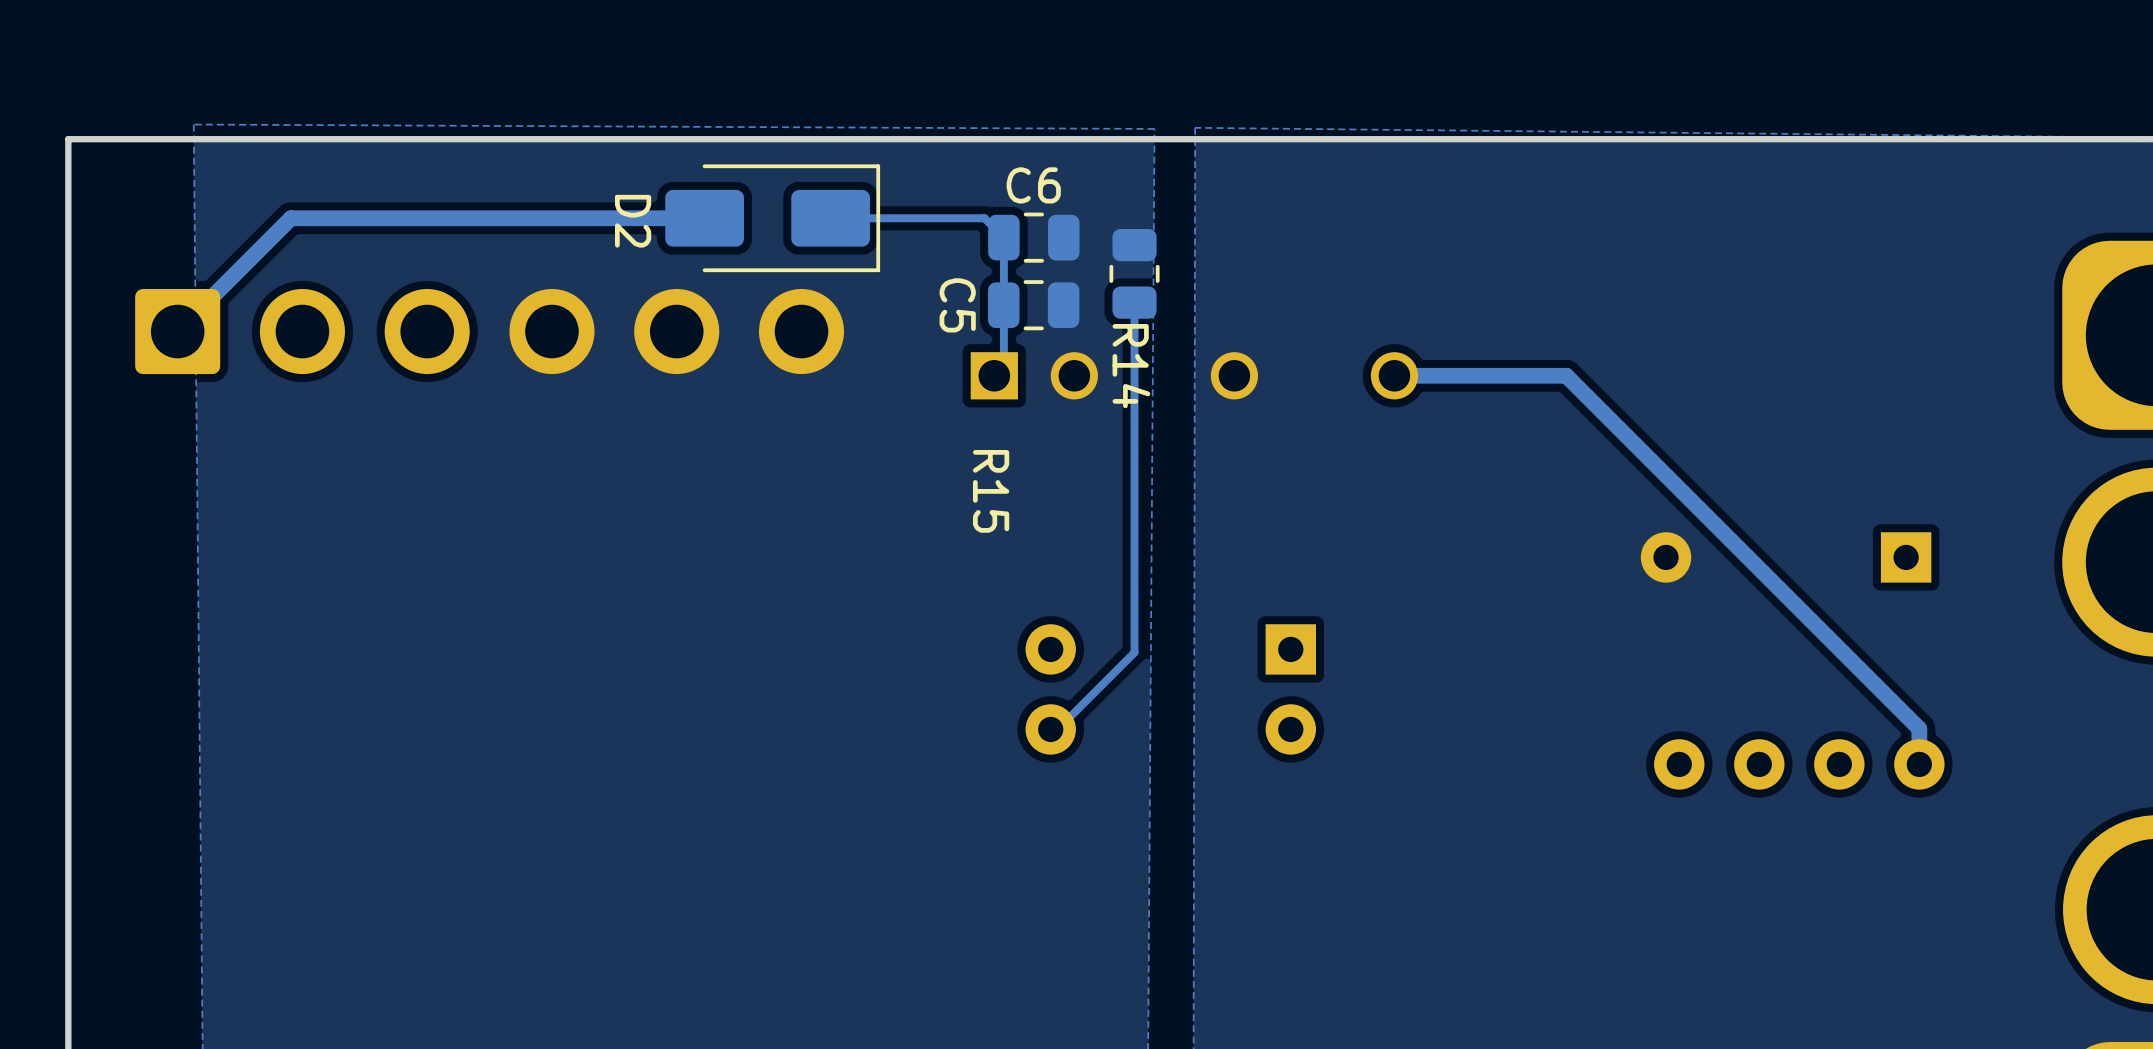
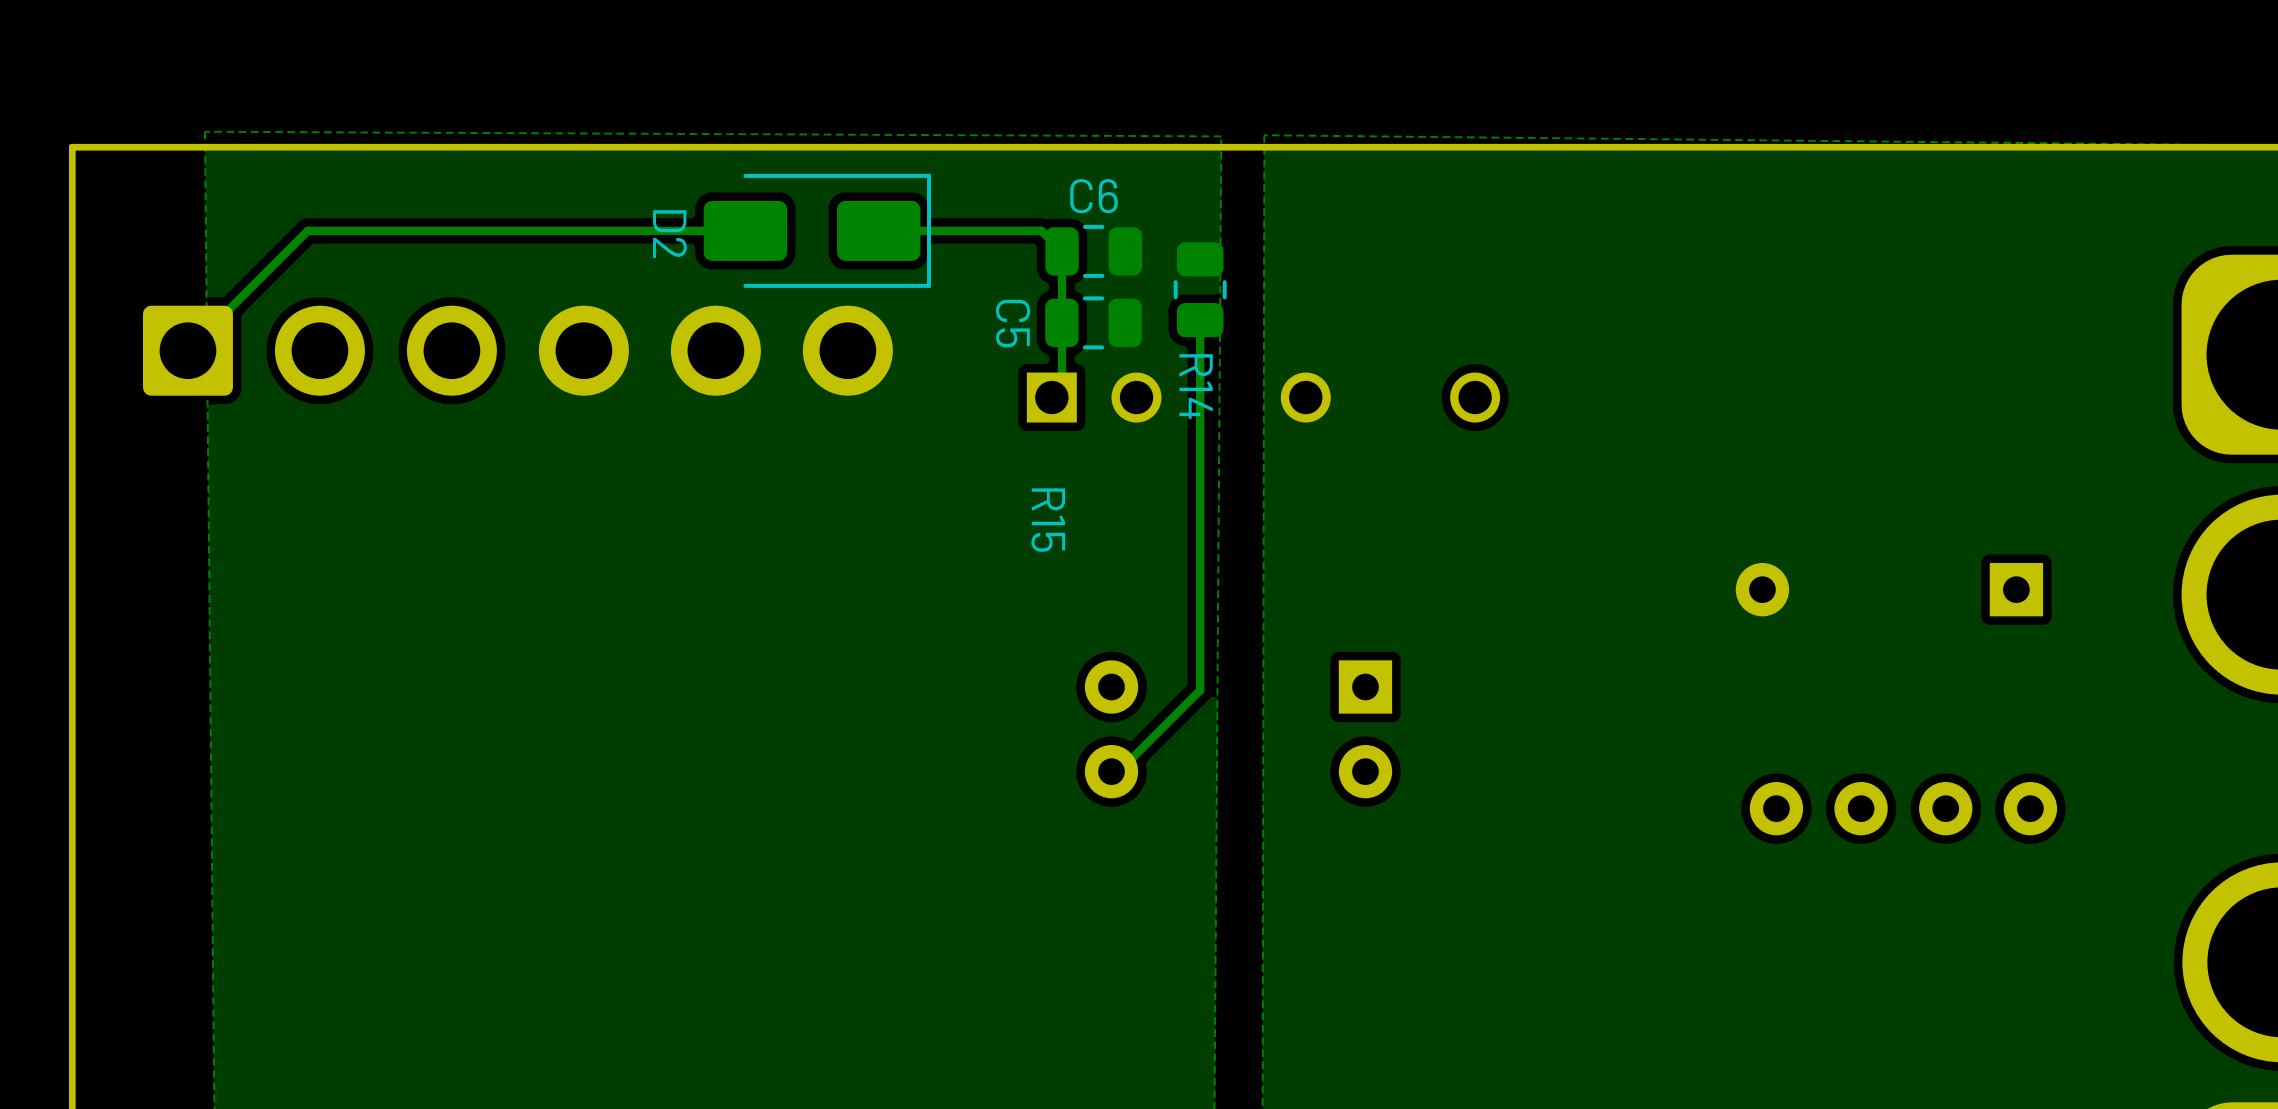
track width: thick (704, 218) (290, 218) (177, 331) -> thin (745, 230) (307, 230) (187, 350)
track: (1394, 375) (1566, 375) (1919, 728) (1919, 764) -> none

